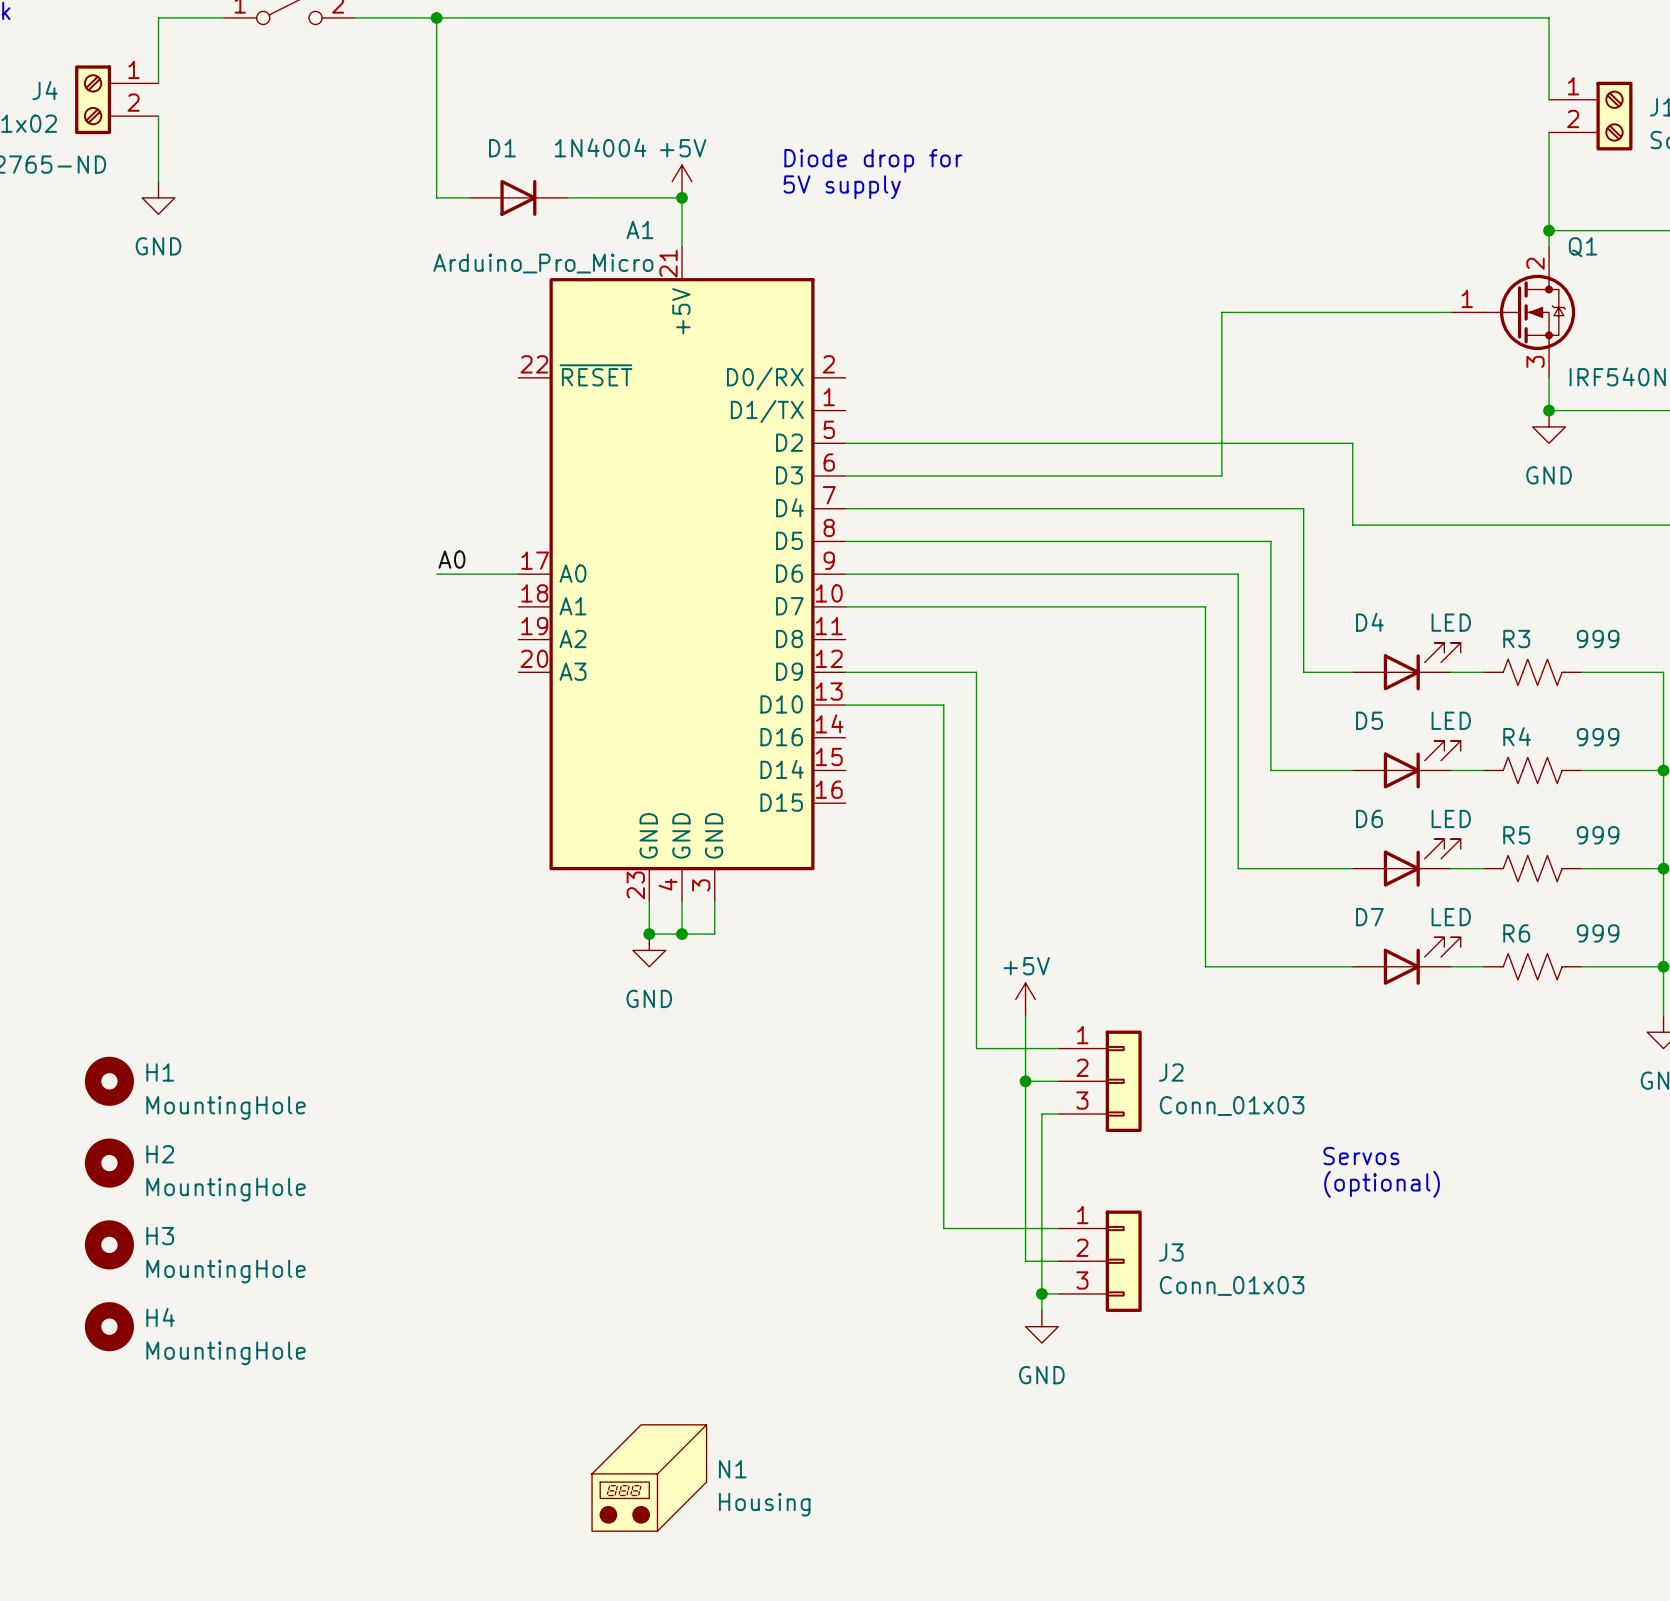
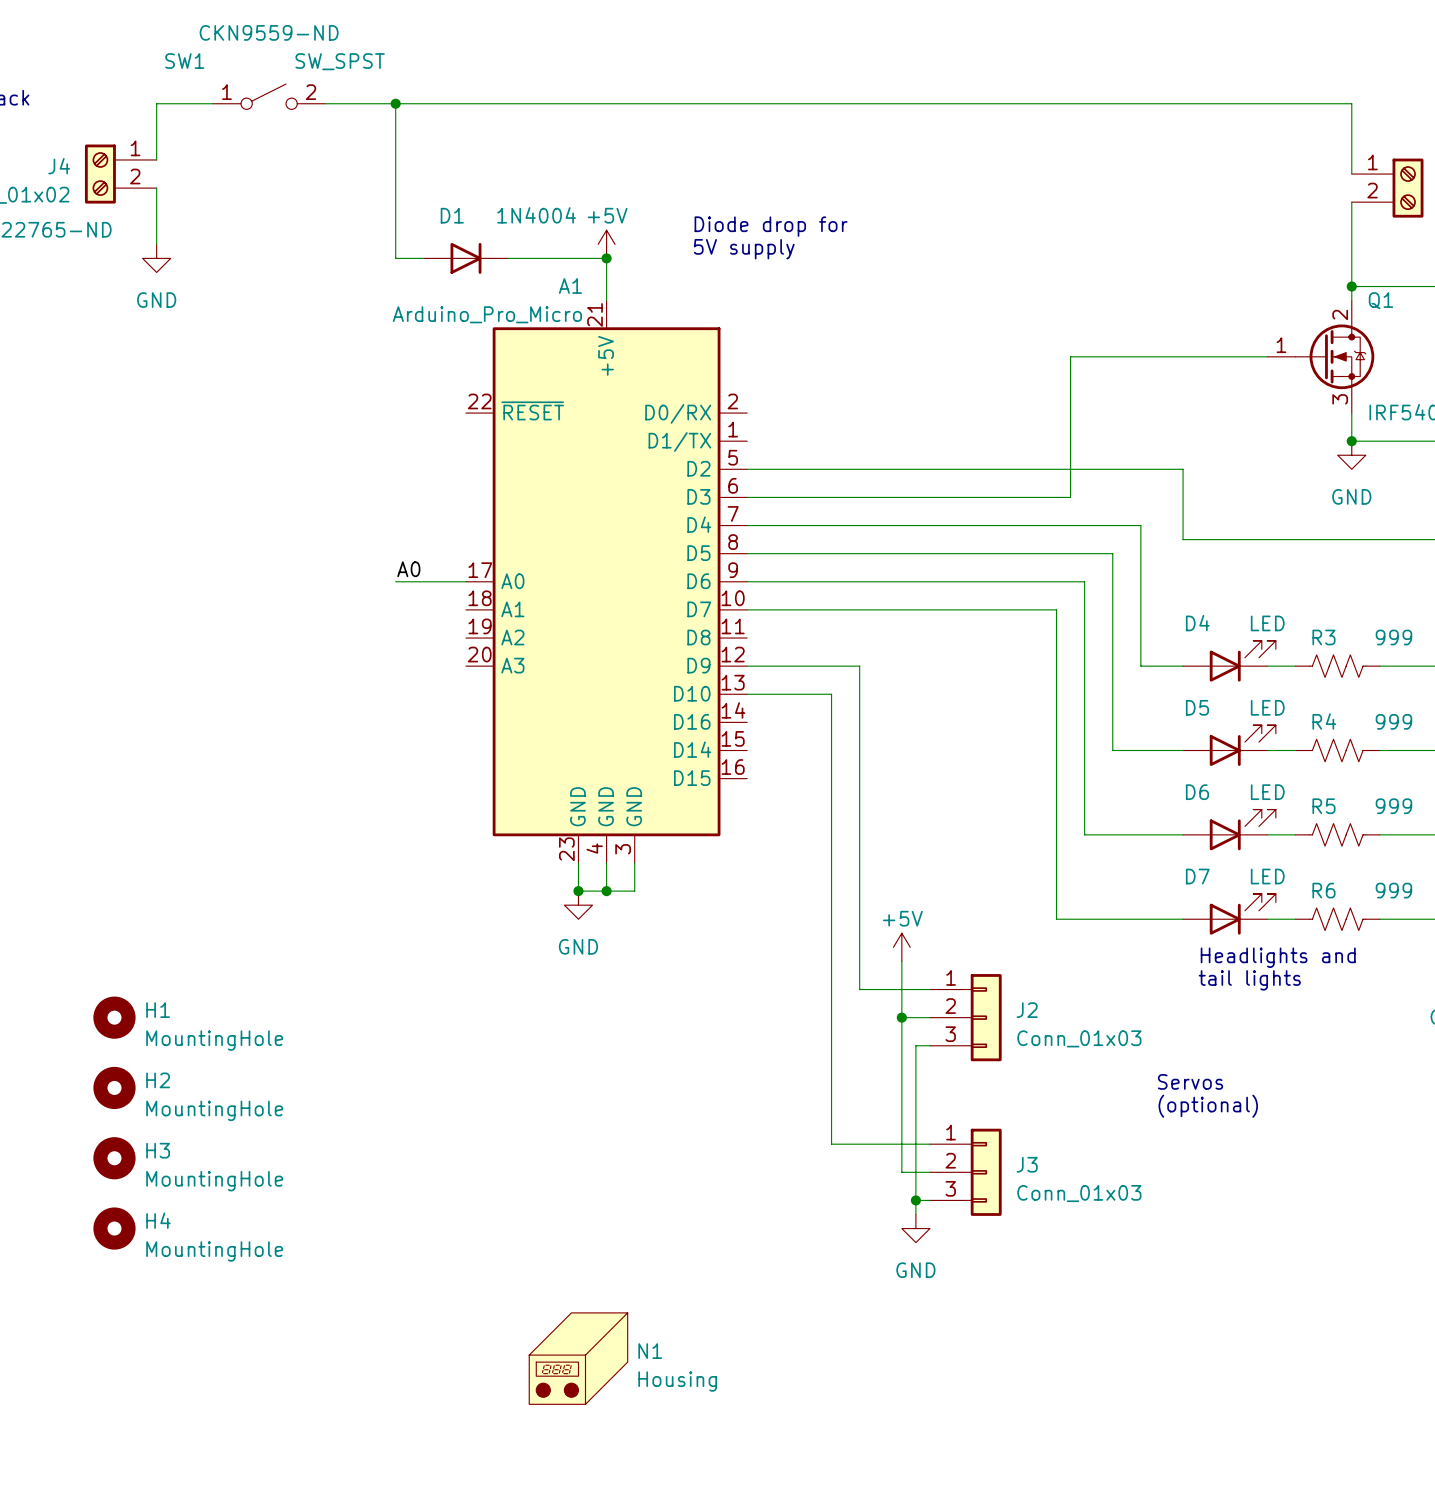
text: none -> Headlights and (1278, 957)
text: none -> tail lights (1249, 980)

